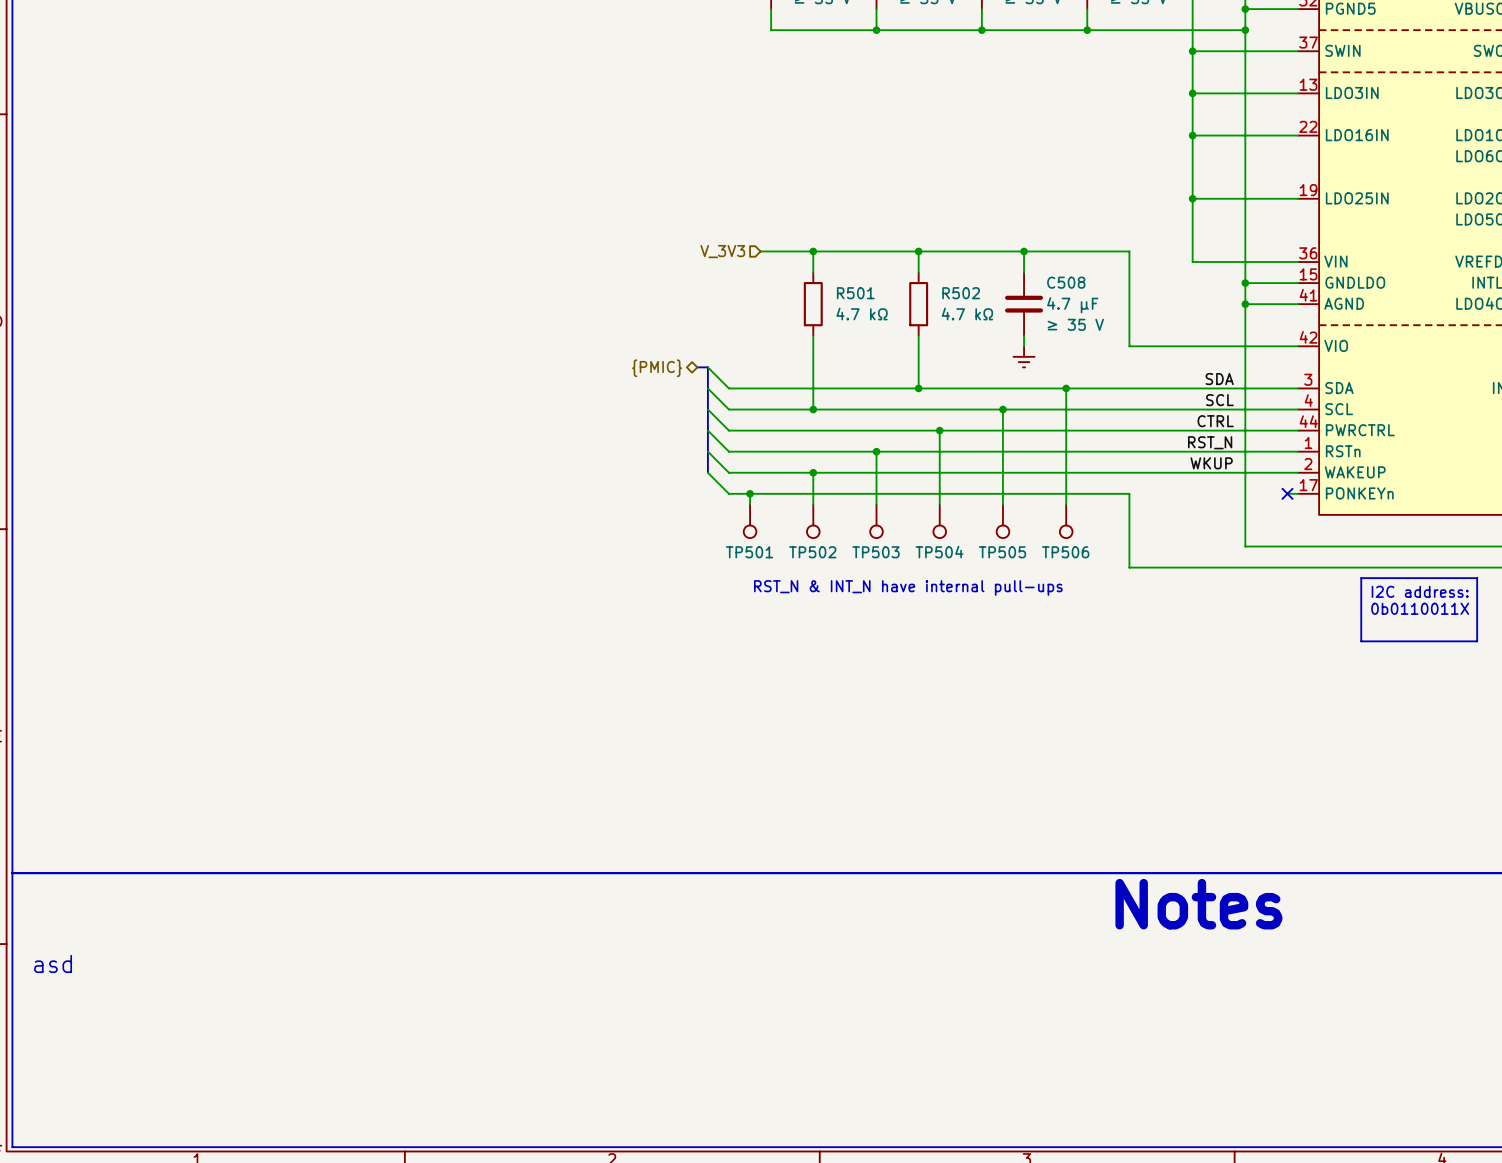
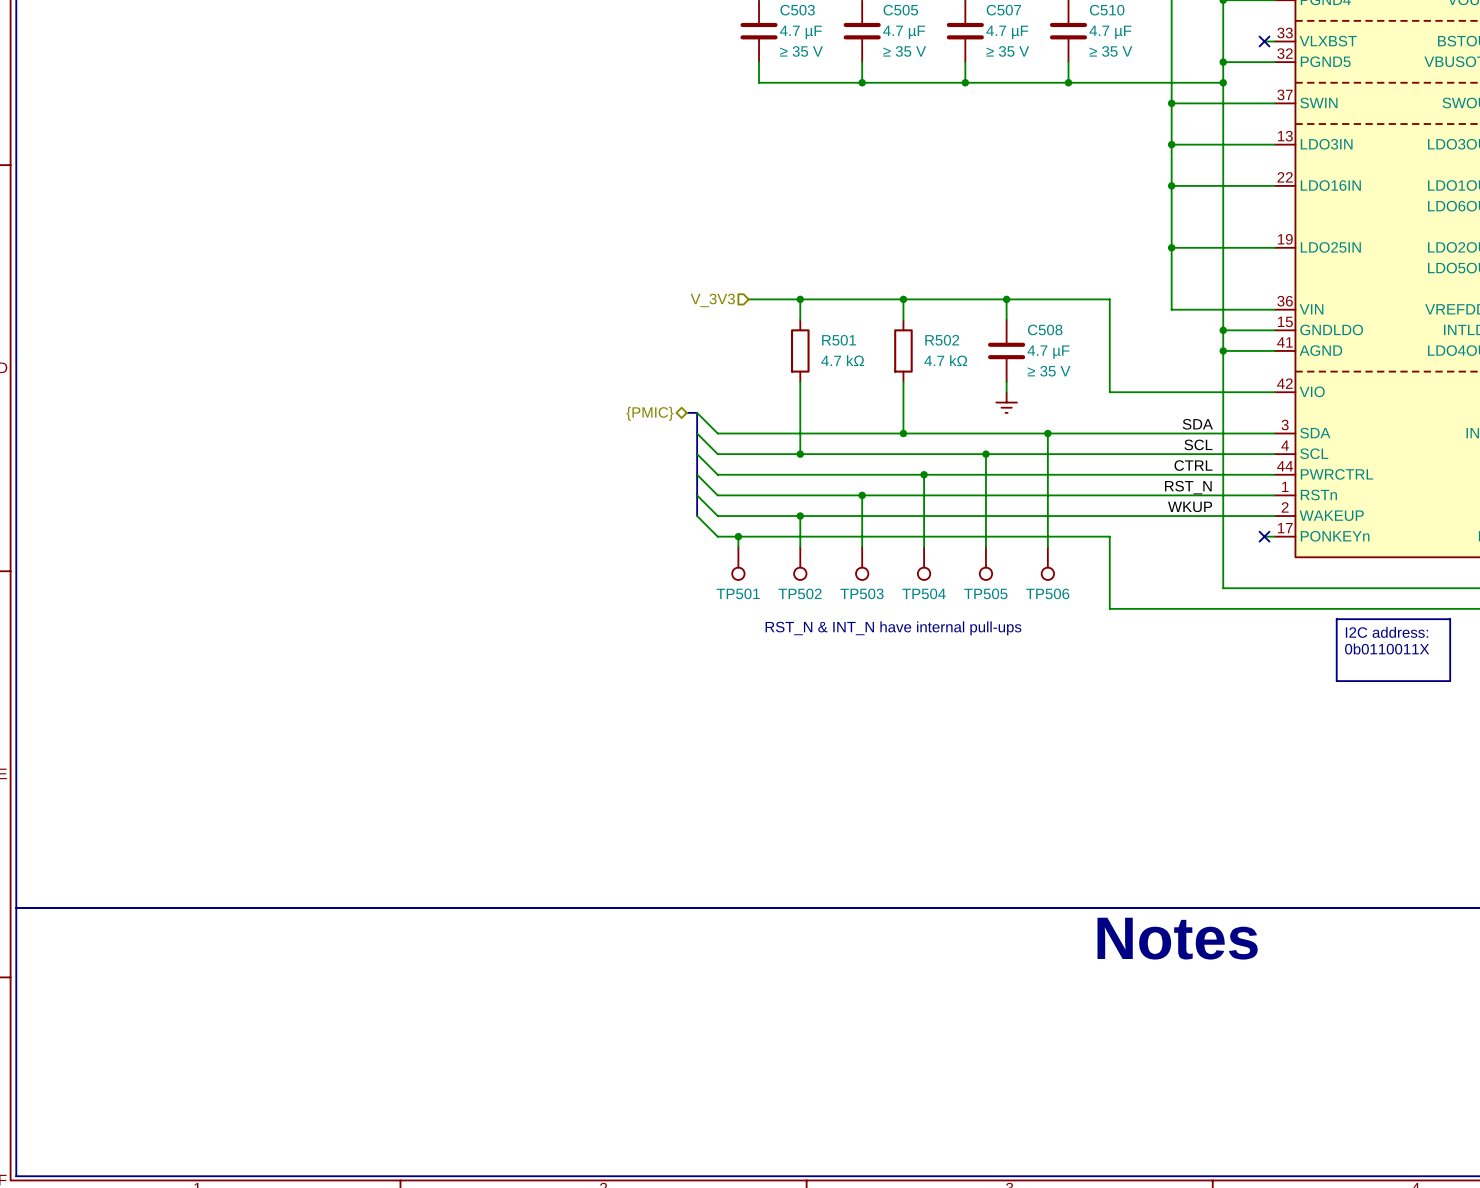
text: asd (53, 963) -> none

